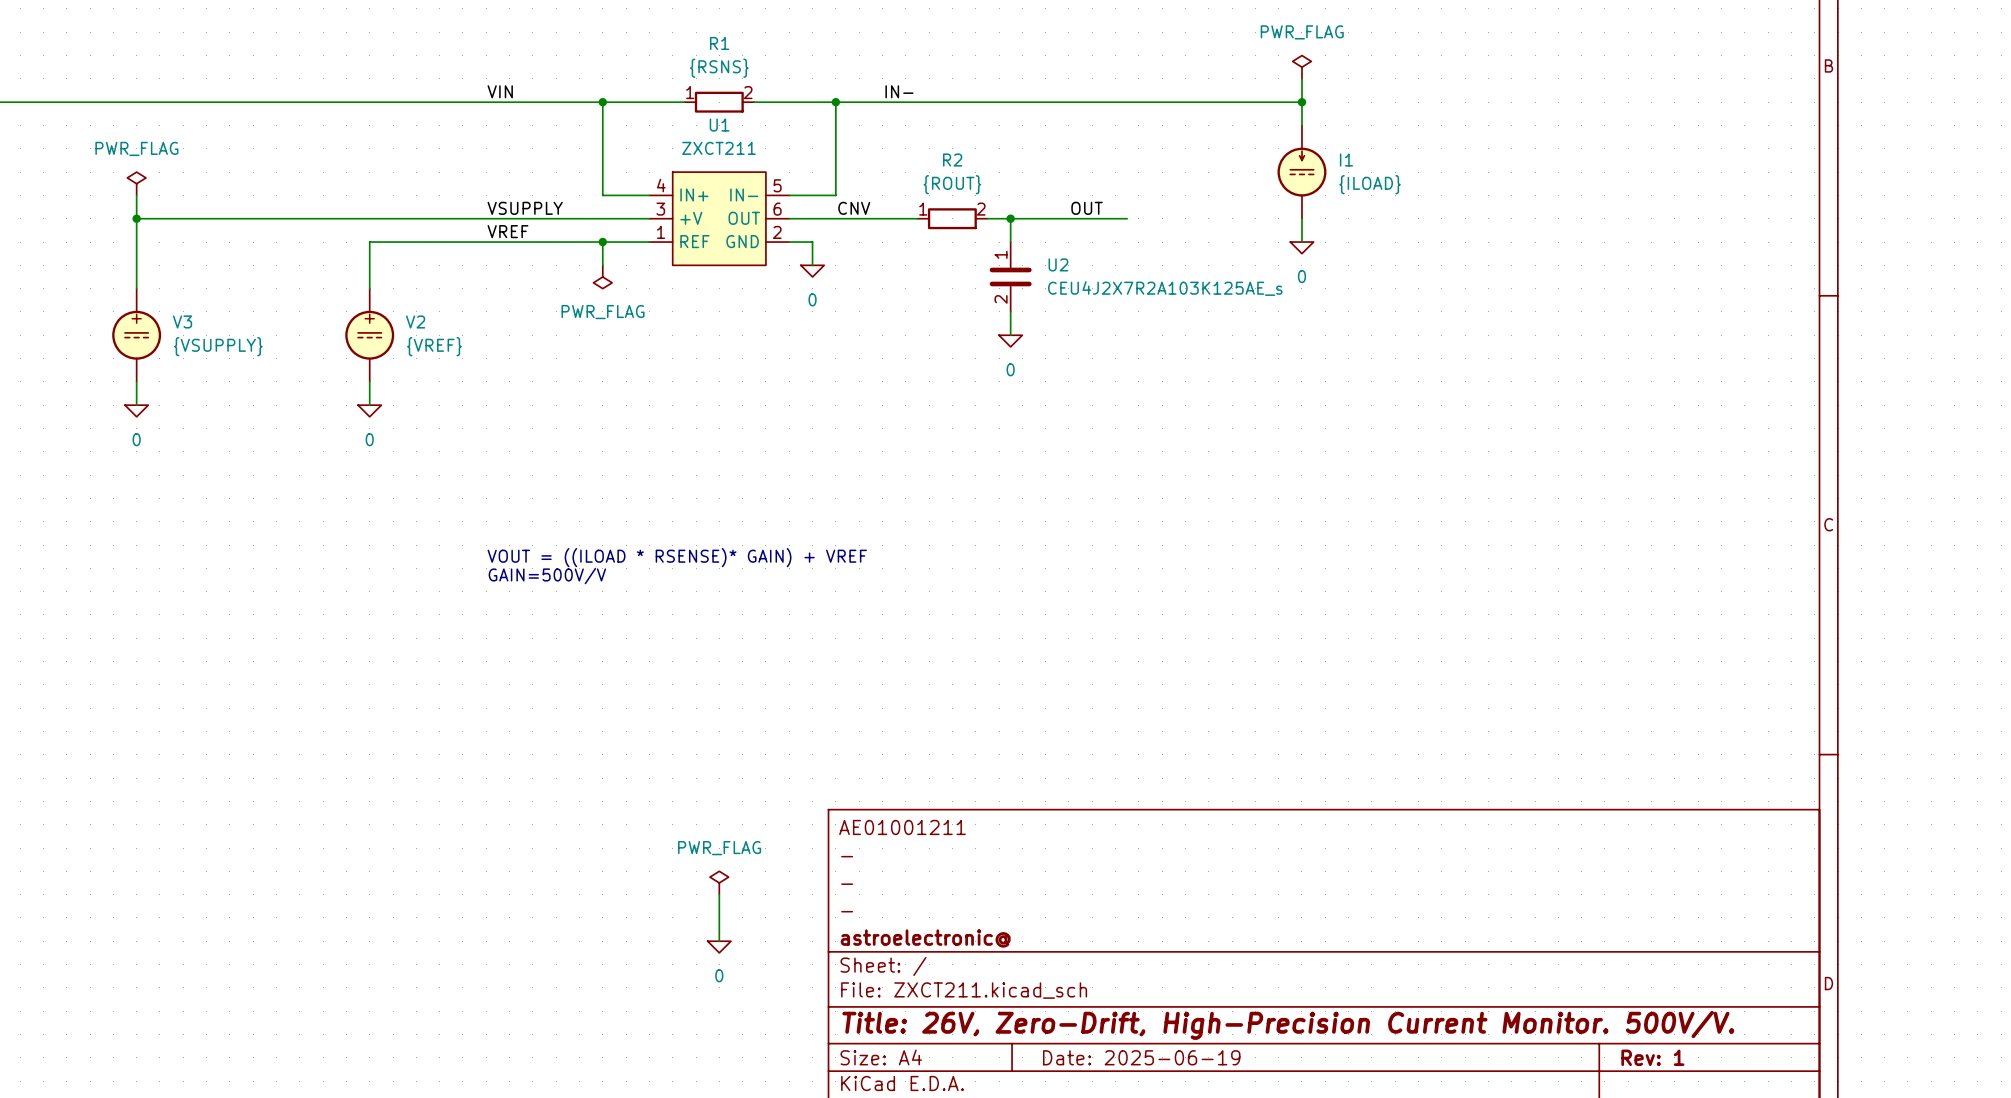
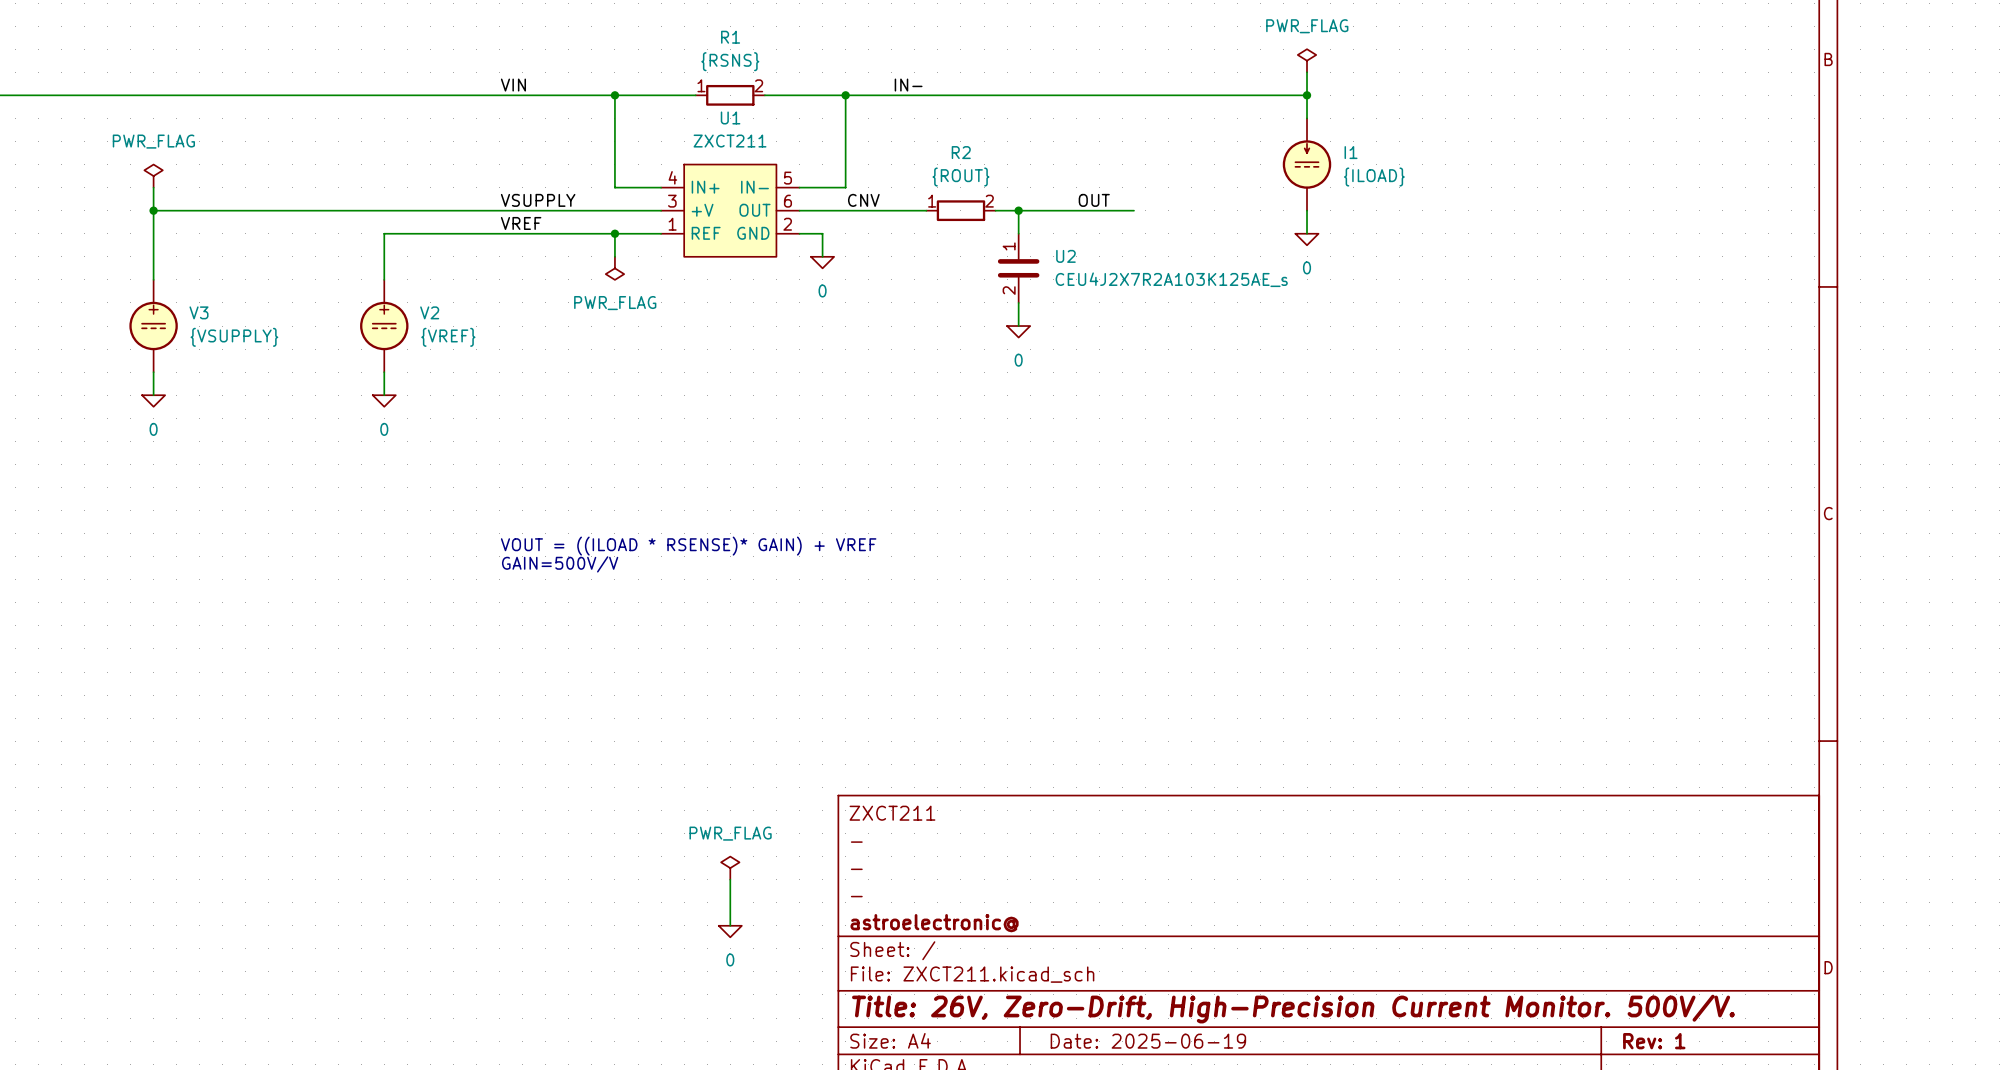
title block: AE01001211 (902, 827) -> ZXCT211 (892, 813)

